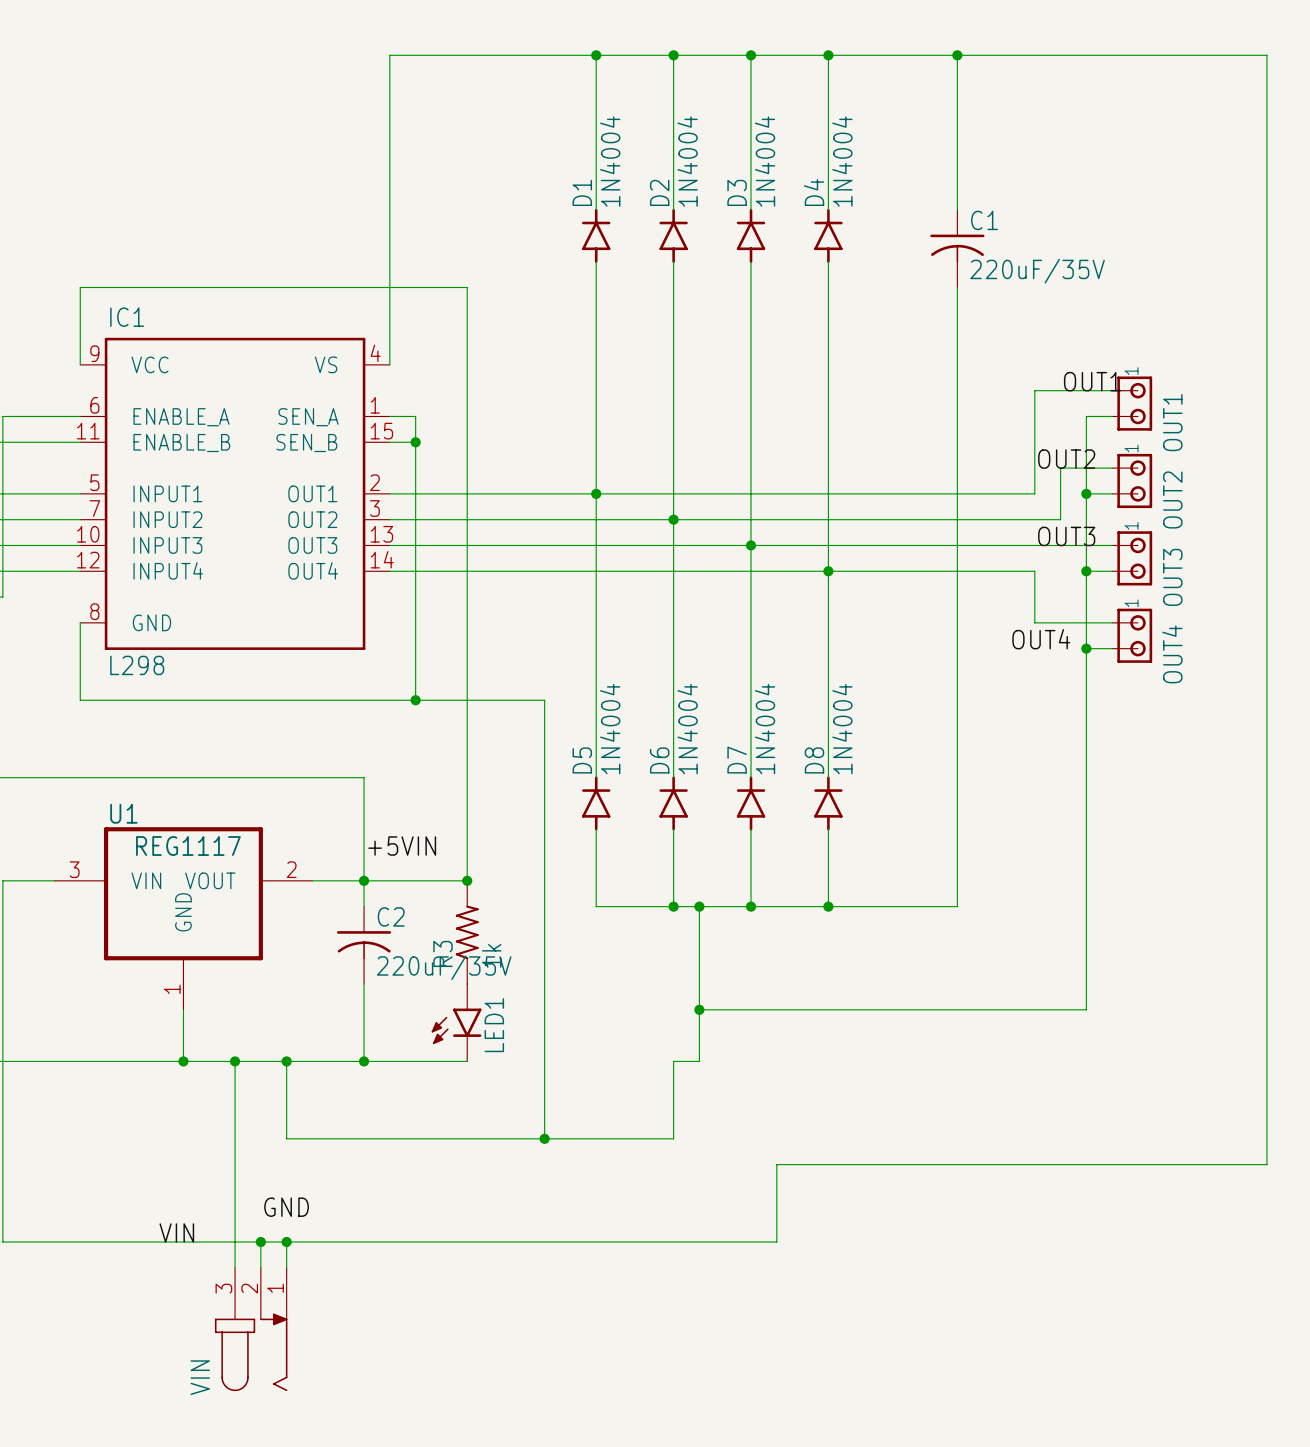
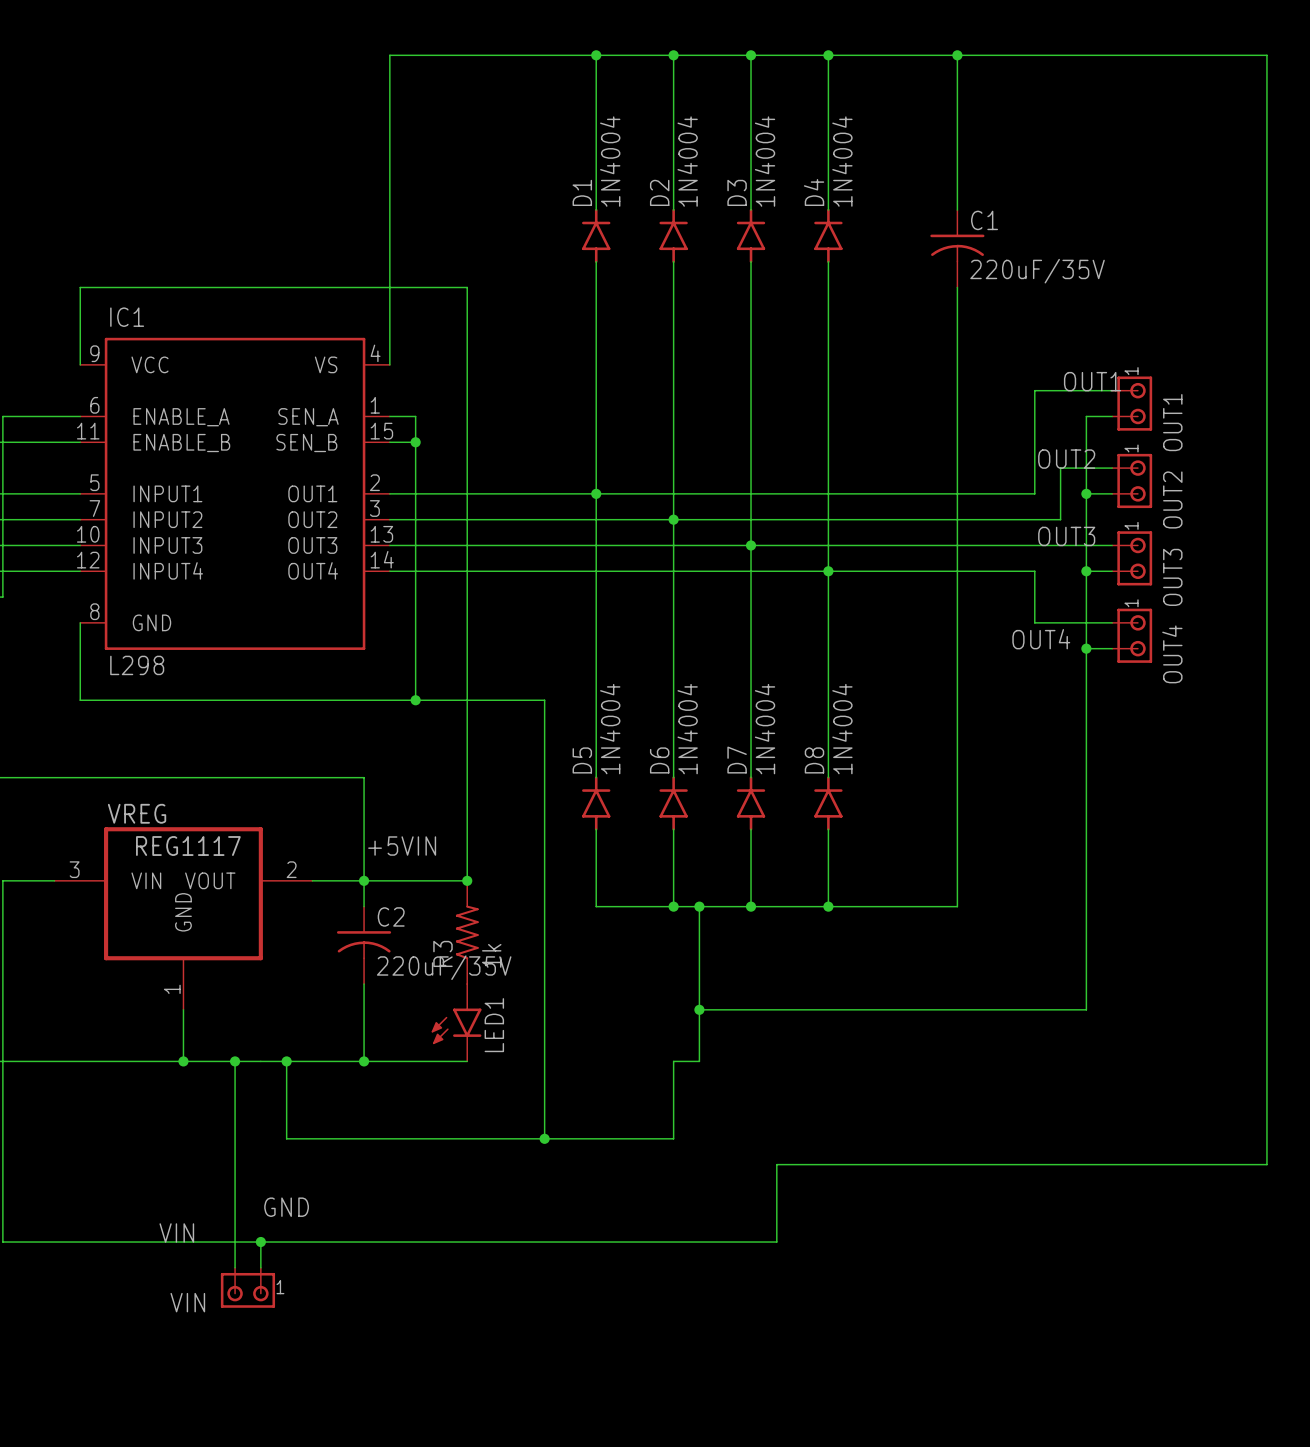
U1 name: U1 (123, 813) -> VREG (137, 813)
wire: (286, 1242) (286, 1267) -> none
junction: (286, 1242) -> none
VIN: none -> (247, 1287)
VIN: (251, 1329) -> none

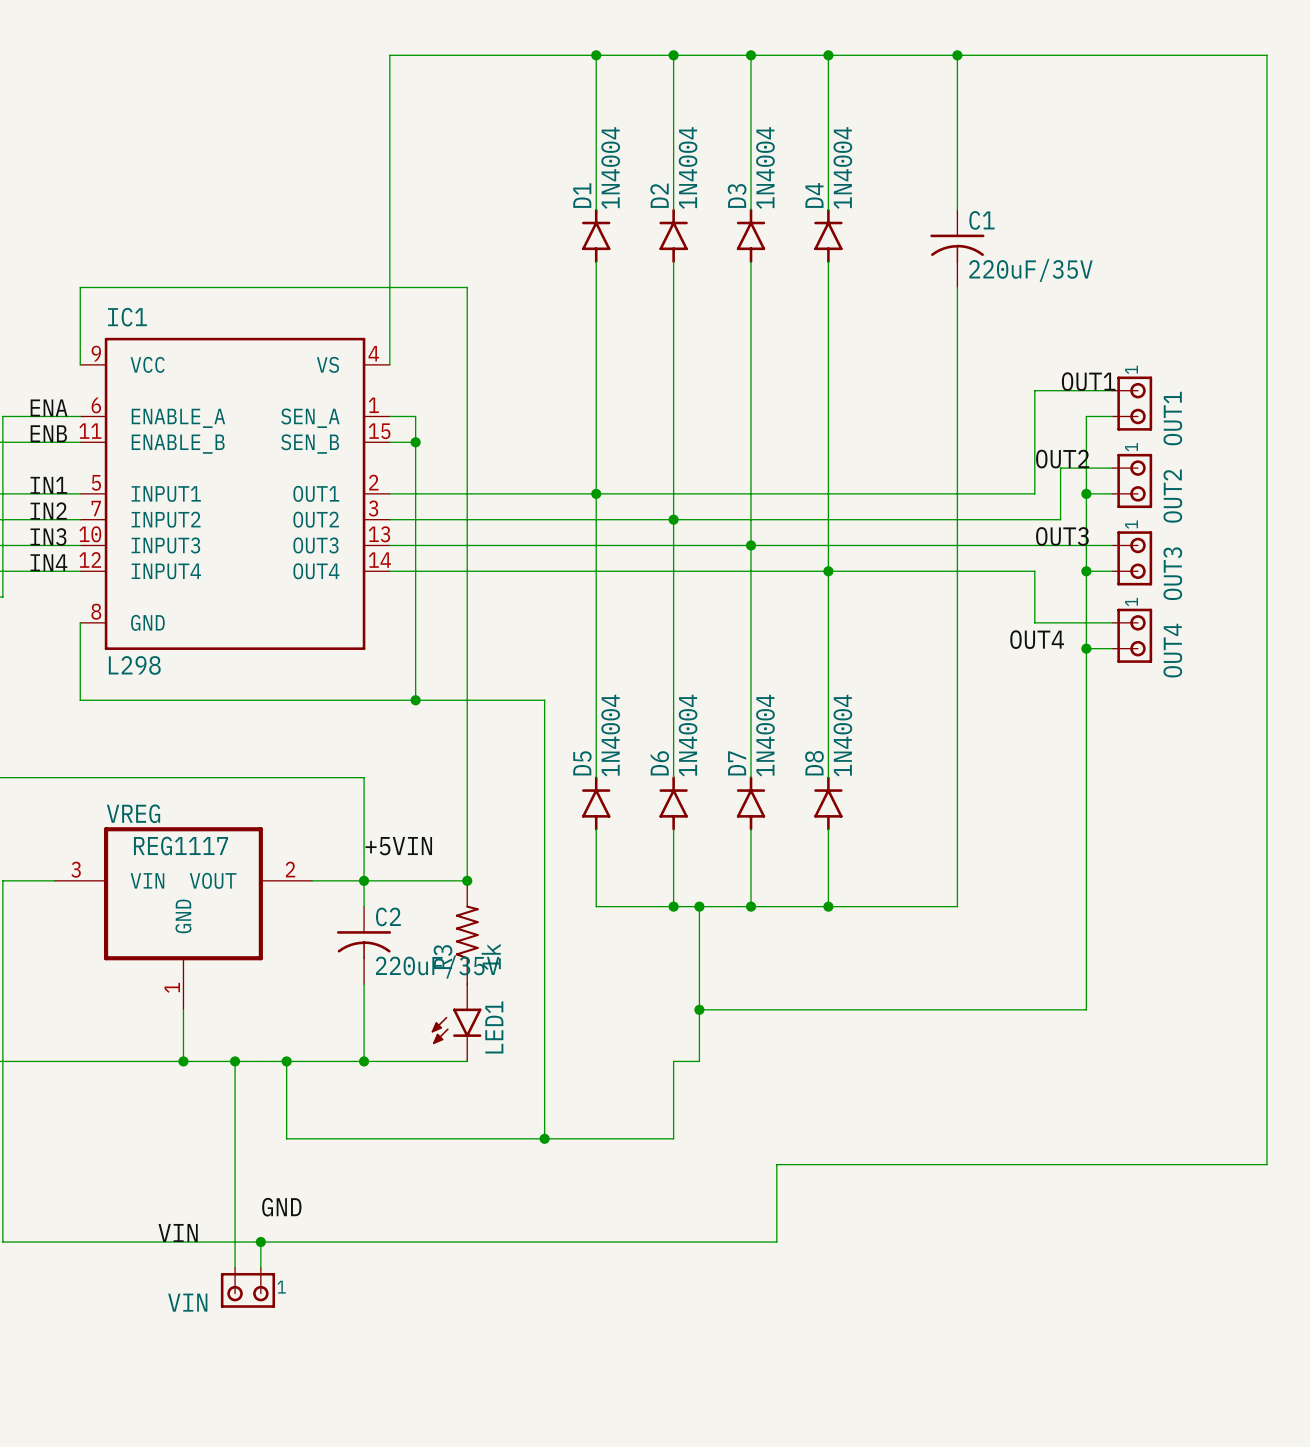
label: none -> ENA (49, 407)
label: none -> ENB (48, 433)
label: none -> IN1 (48, 485)
label: none -> IN2 (48, 511)
label: none -> IN3 (48, 536)
label: none -> IN4 (48, 562)

